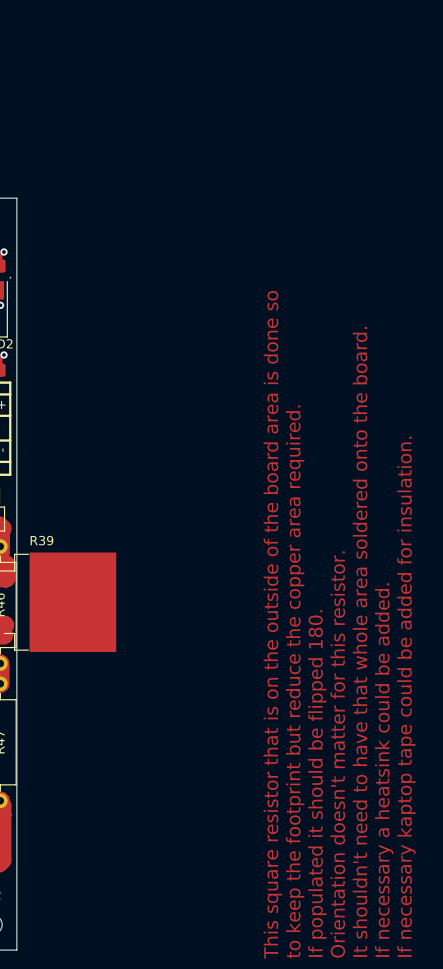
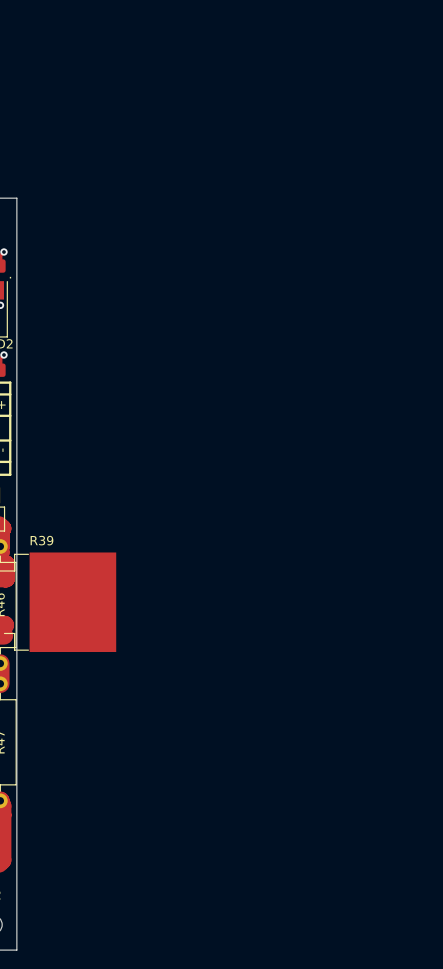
text: This square resistor that is on the outside of the board area is done so (272, 624) -> none
text: It shouldn't need to have that whole area soldered onto the board. (360, 641) -> none
text: to keep the footprint but reduce the copper area required. (295, 681) -> none
text: If necessary kaptop tape could be added for insulation. (406, 696) -> none
text: Orientation doesn't matter for this resistor. (337, 754) -> none
text: If necessary a heatsink could be added. (384, 770) -> none
text: If populated it should be flipped 180. (317, 783) -> none

